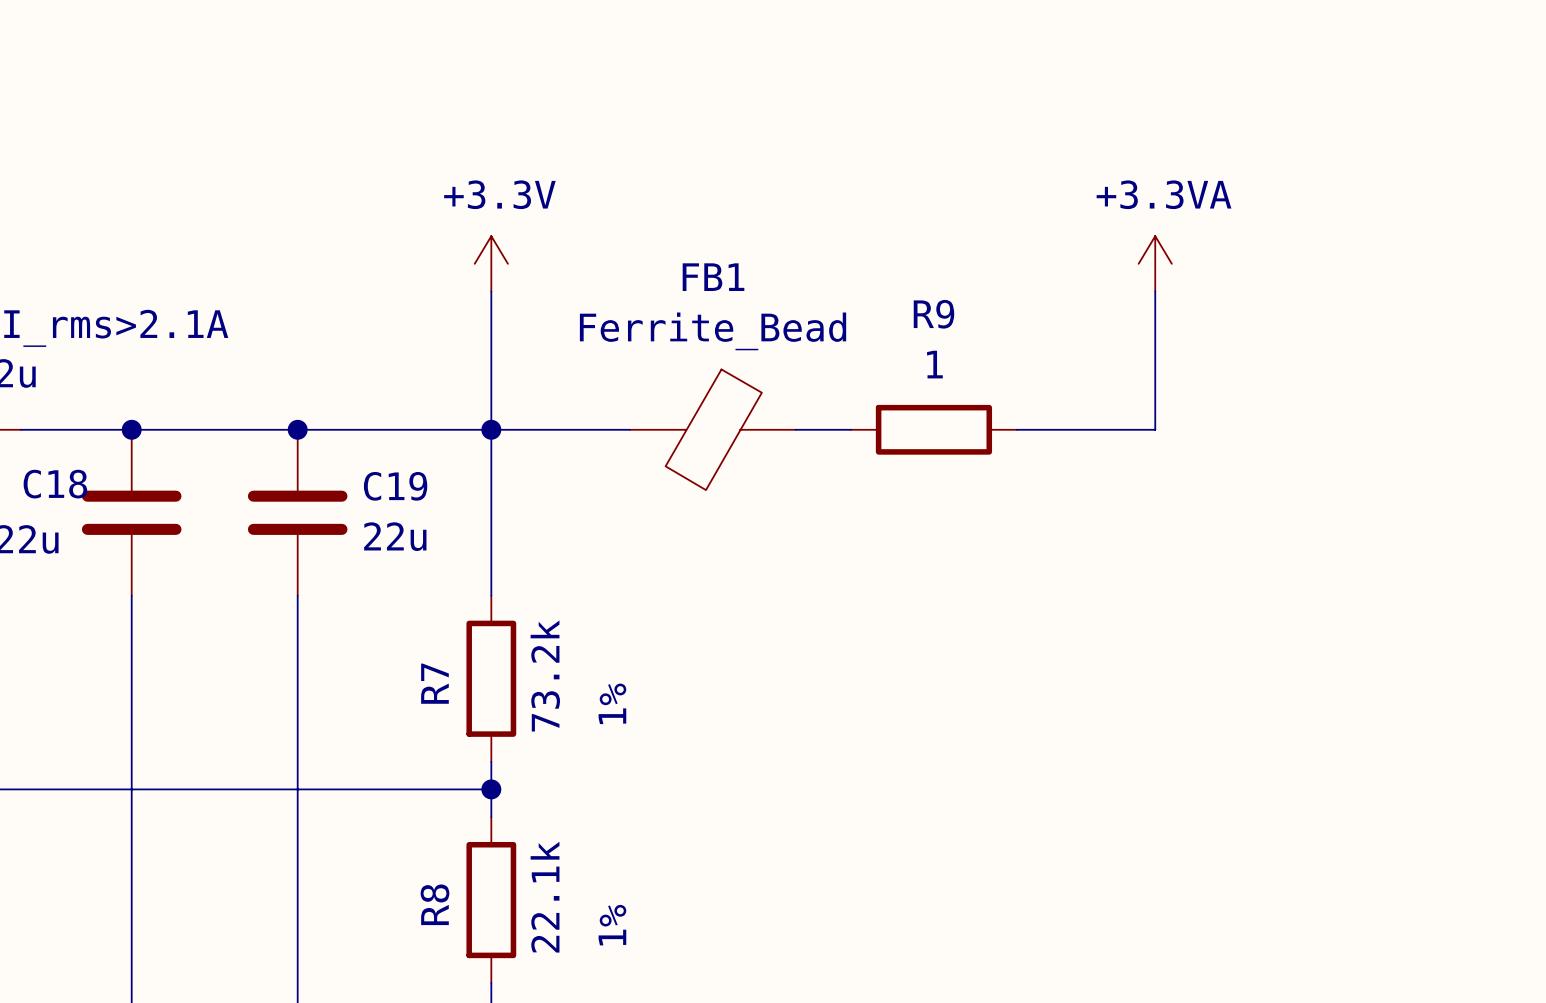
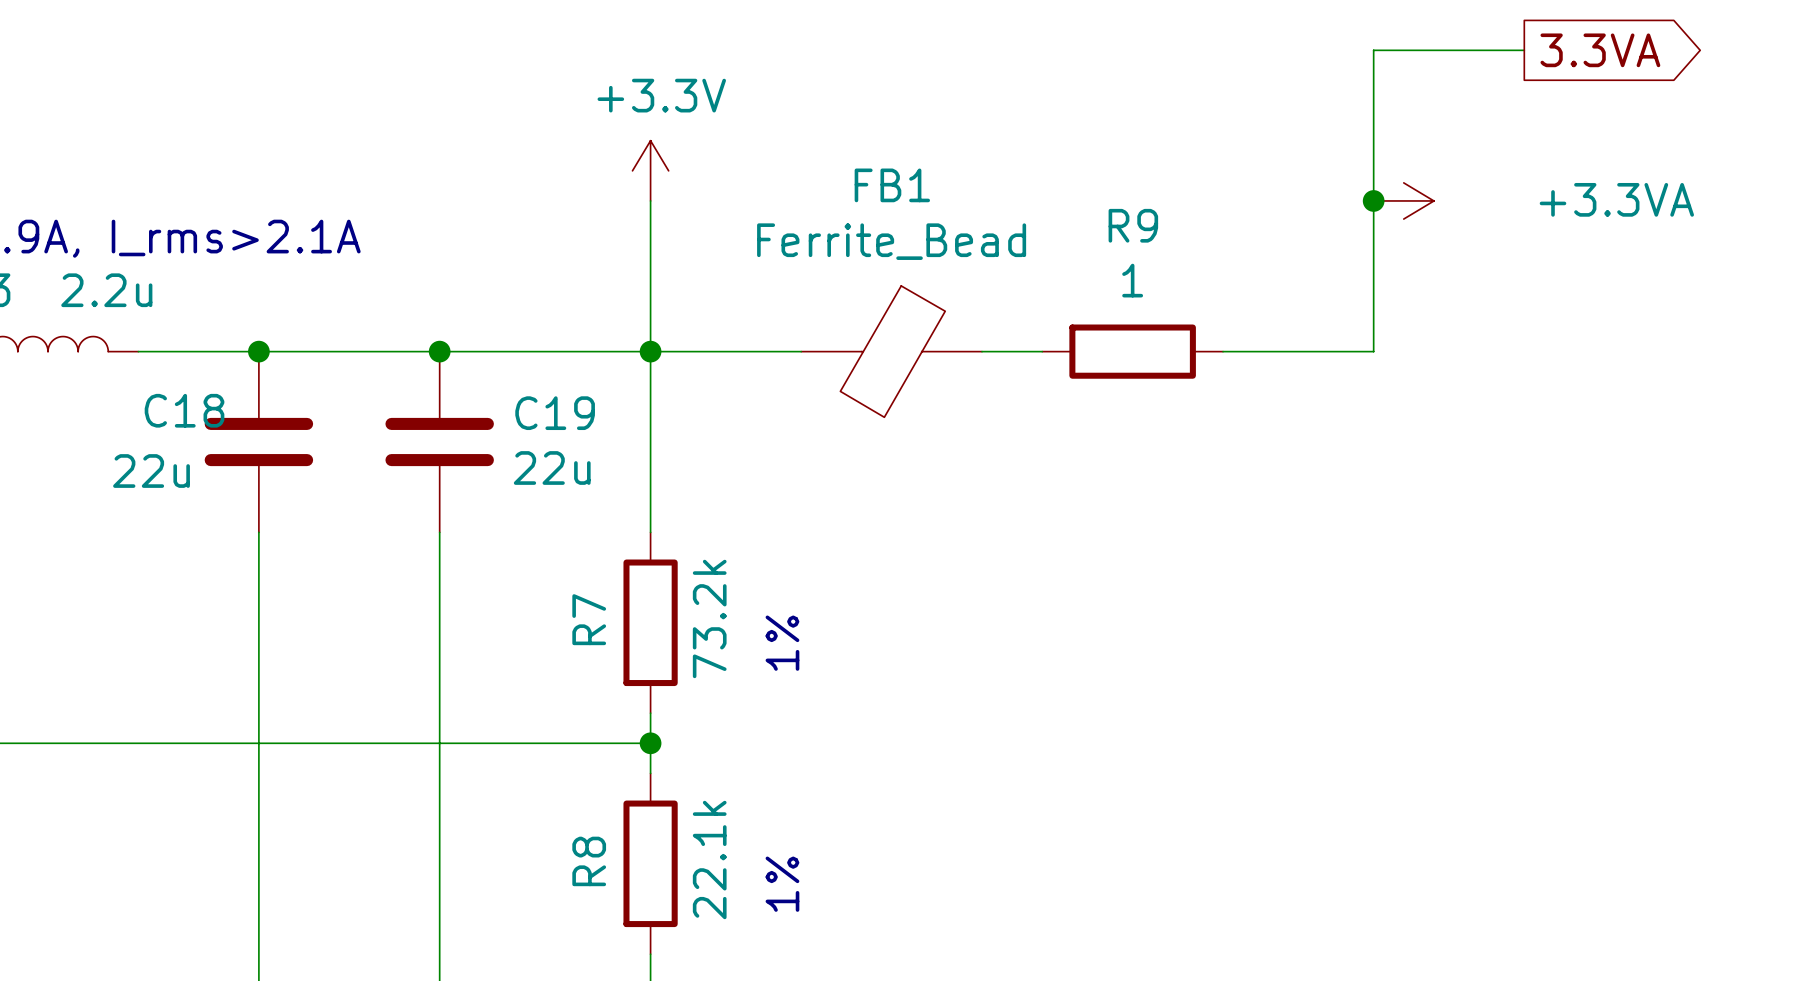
wire: none -> (1524, 50) (1373, 50) (1373, 200)
global label: none -> 3.3VA (1600, 50)
power symbol text position: +3.3VA (1164, 194) -> +3.3VA (1616, 199)
power symbol rotation: 0° (1155, 263) -> 90° clockwise (1403, 200)
power symbol position: +3.3VA (1155, 263) -> +3.3VA (1403, 200)
junction: none -> (1373, 200)

